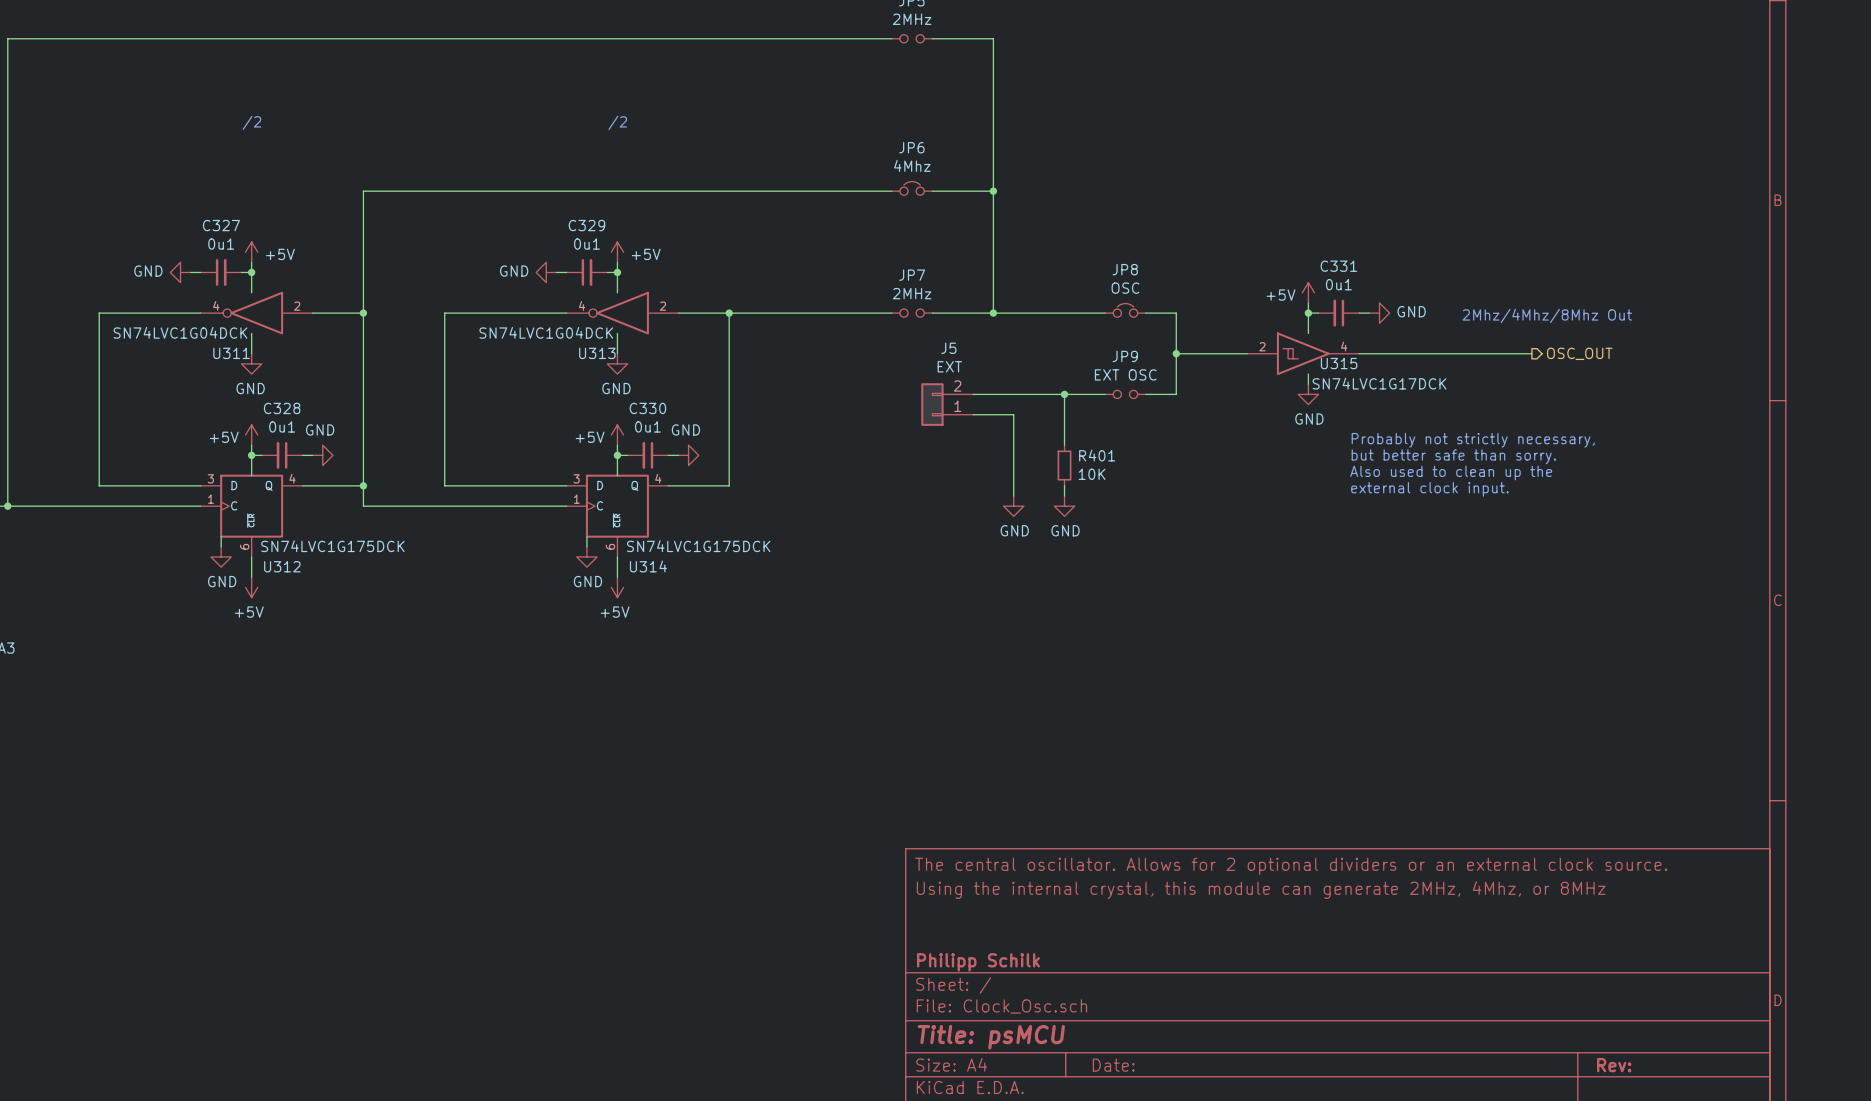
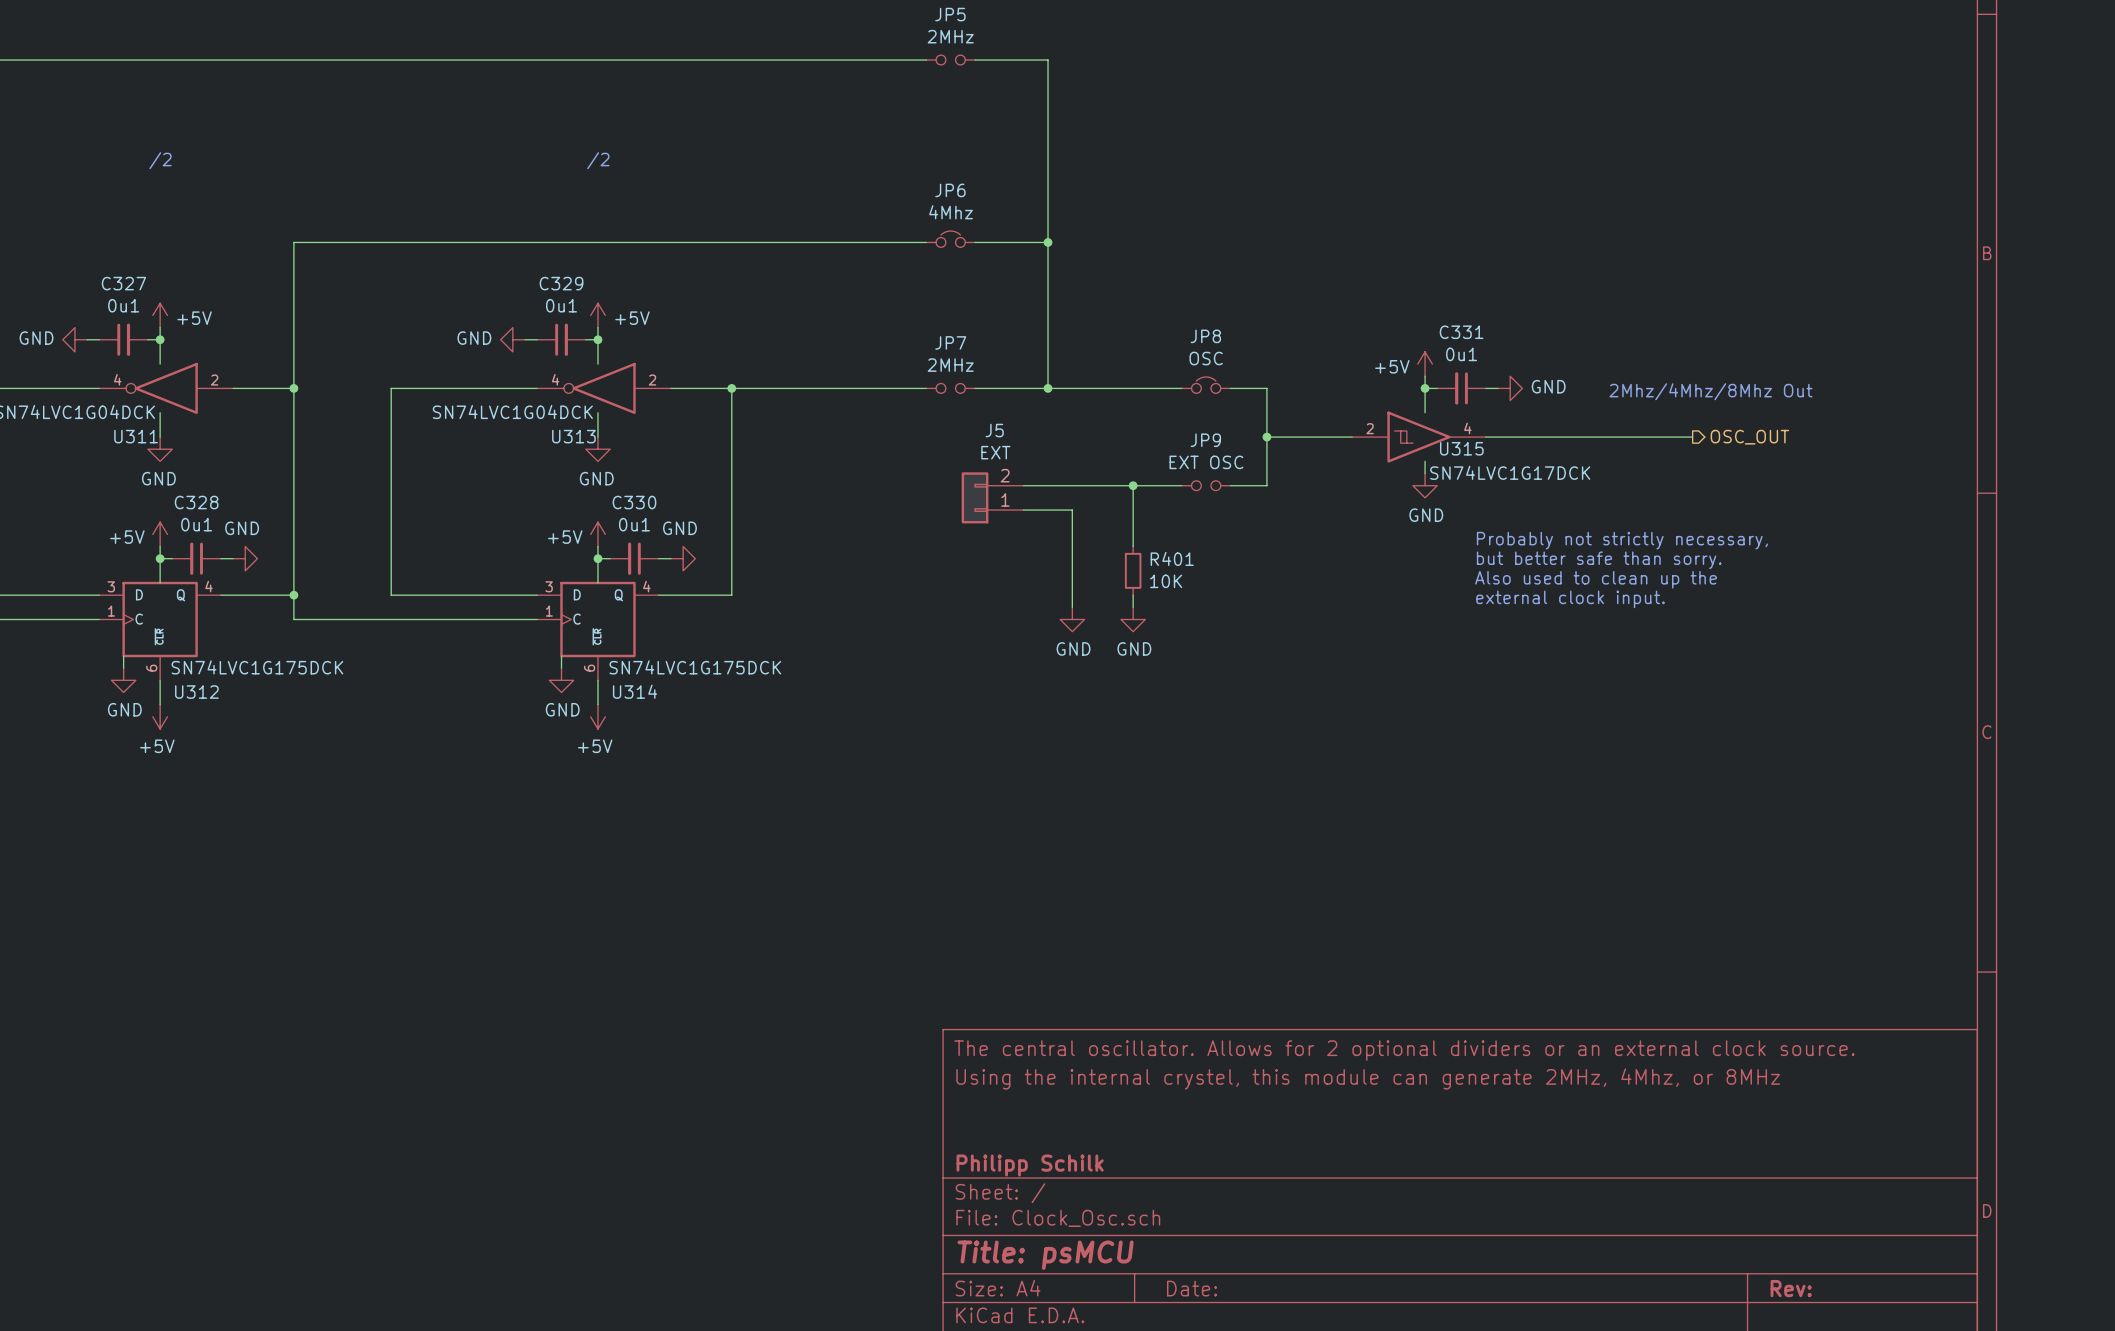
title block: Using the internal crystal, this module can generate 2MHz, 4Mhz, or 8MHz (1261, 890) -> Using the internal crystel, this module can generate 2MHz, 4Mhz, or 8MHz (1368, 1078)

